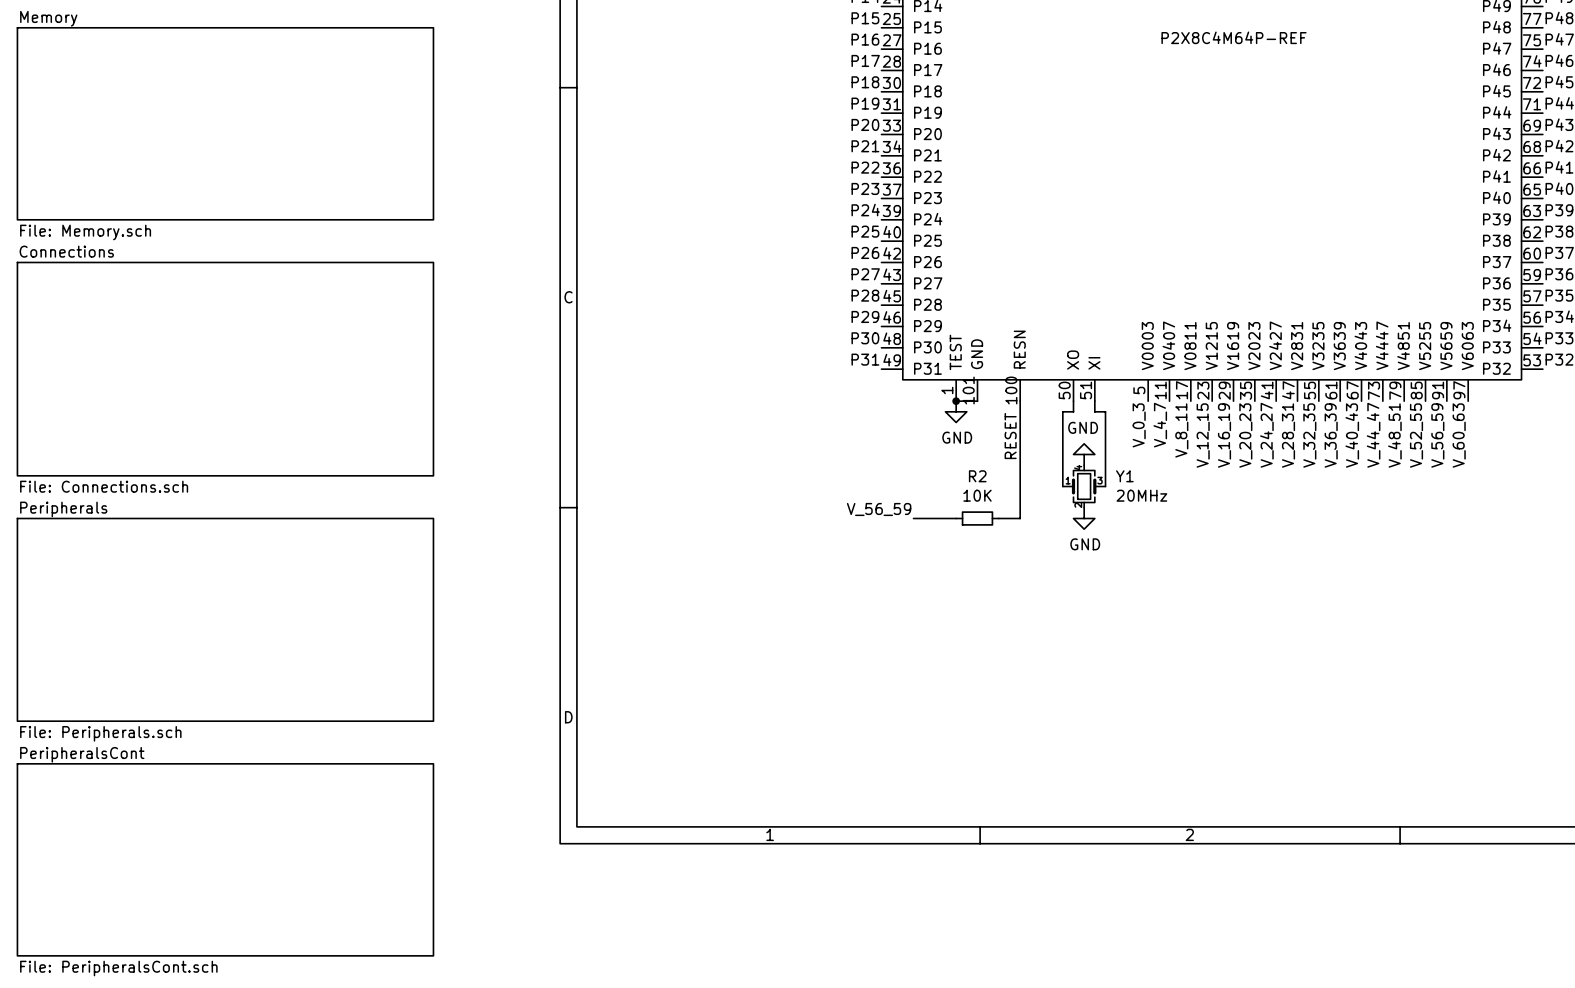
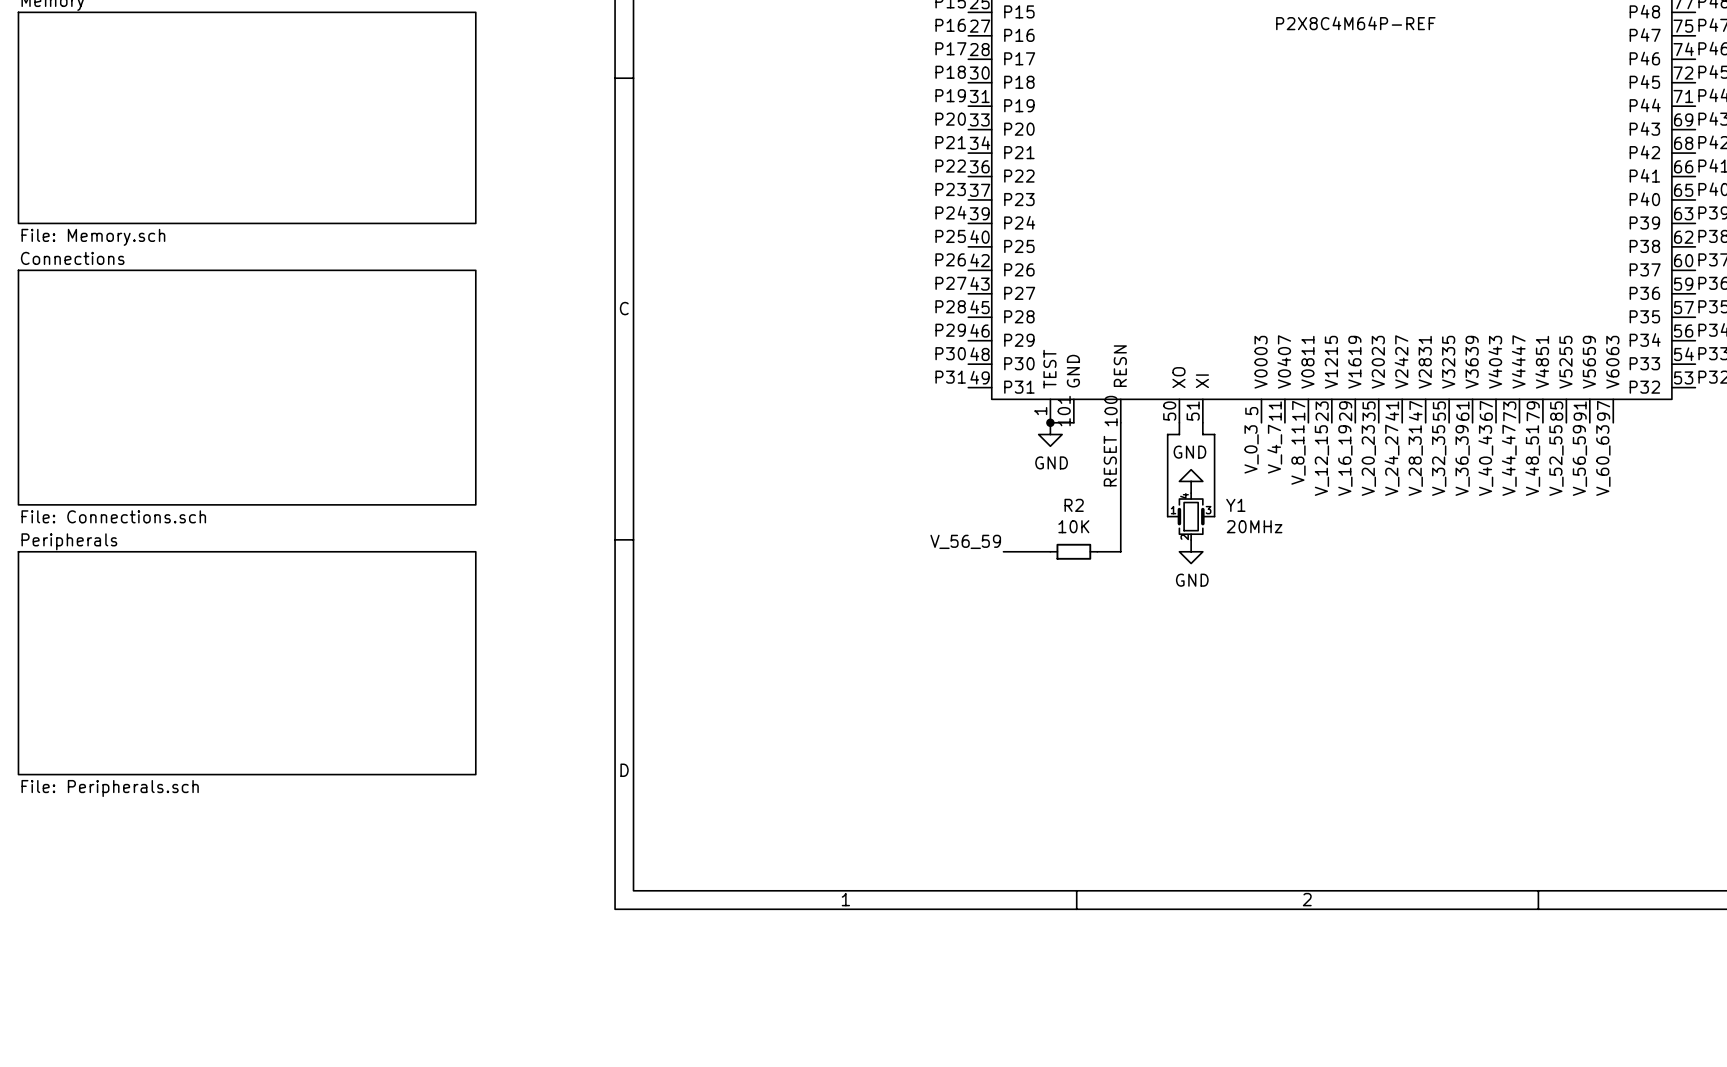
sheet PeripheralsCont: File: PeripheralsCont.sch (225, 859) -> none

